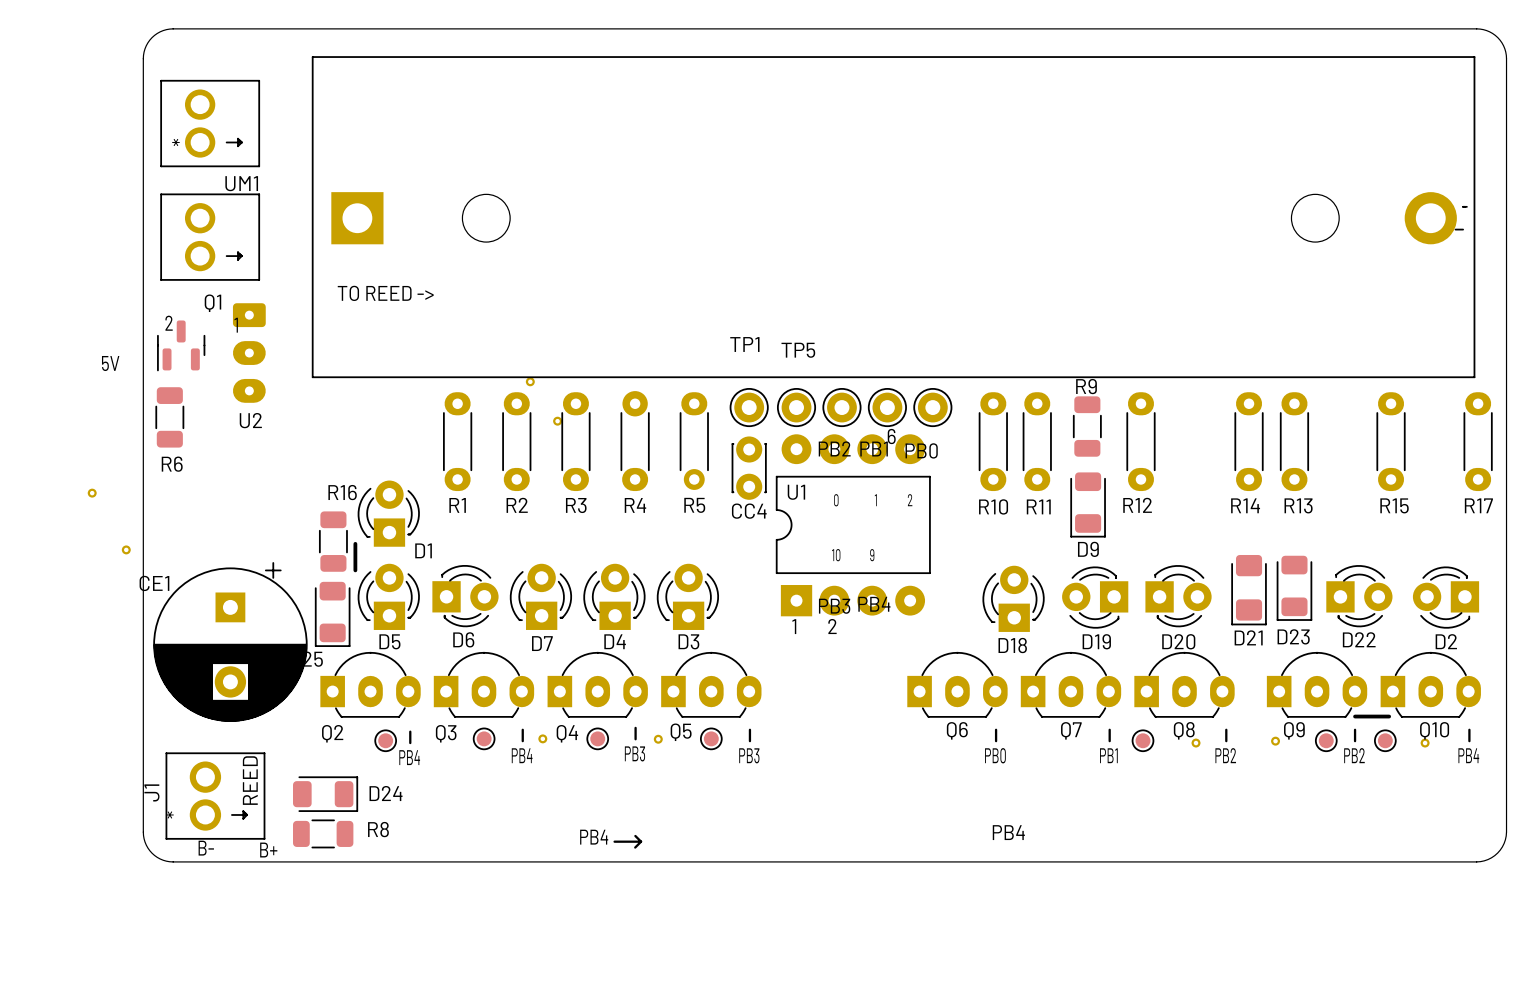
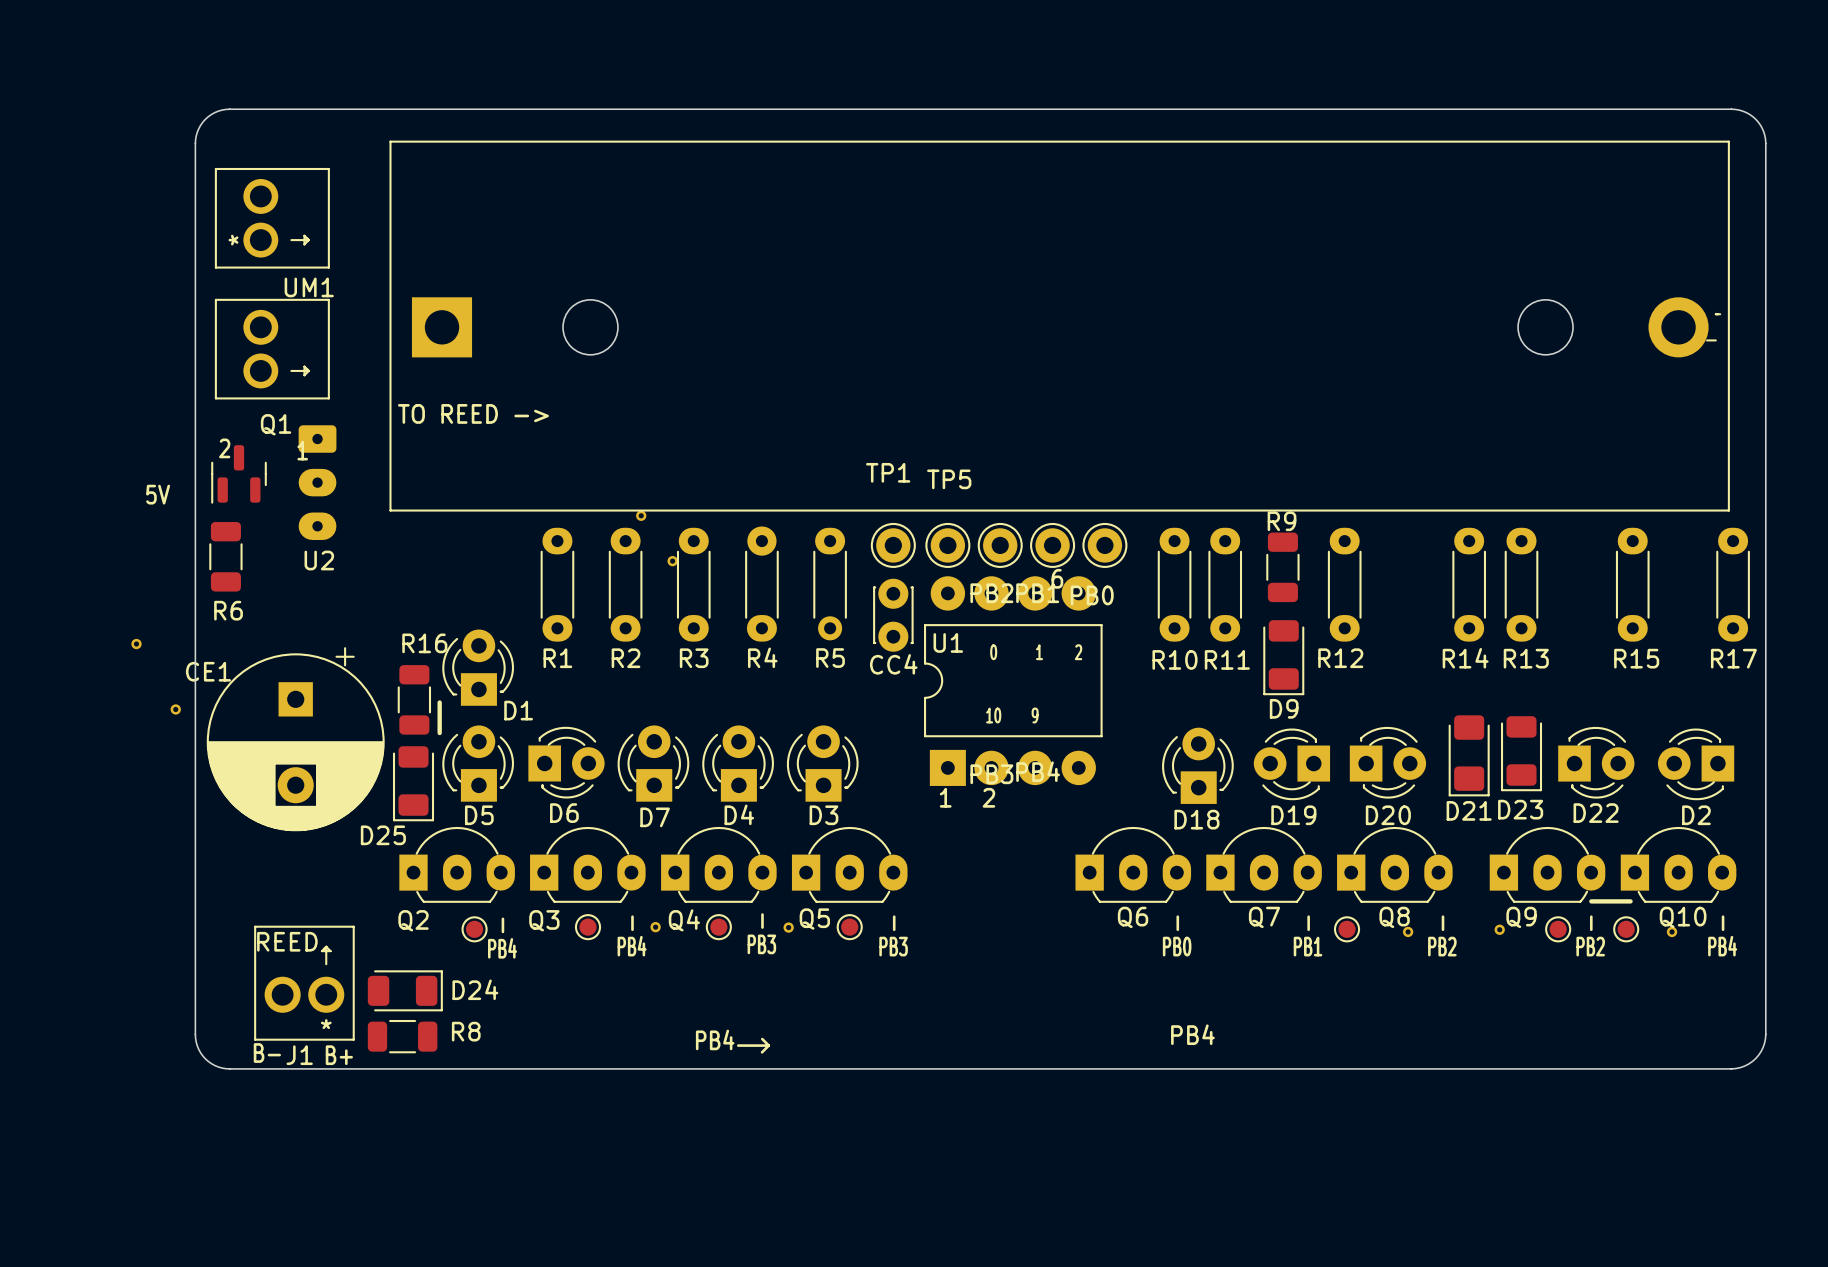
CE1 position: (230, 641) -> (295, 739)
J1 rotation: 0° (215, 796) -> 90° counterclockwise (304, 983)

